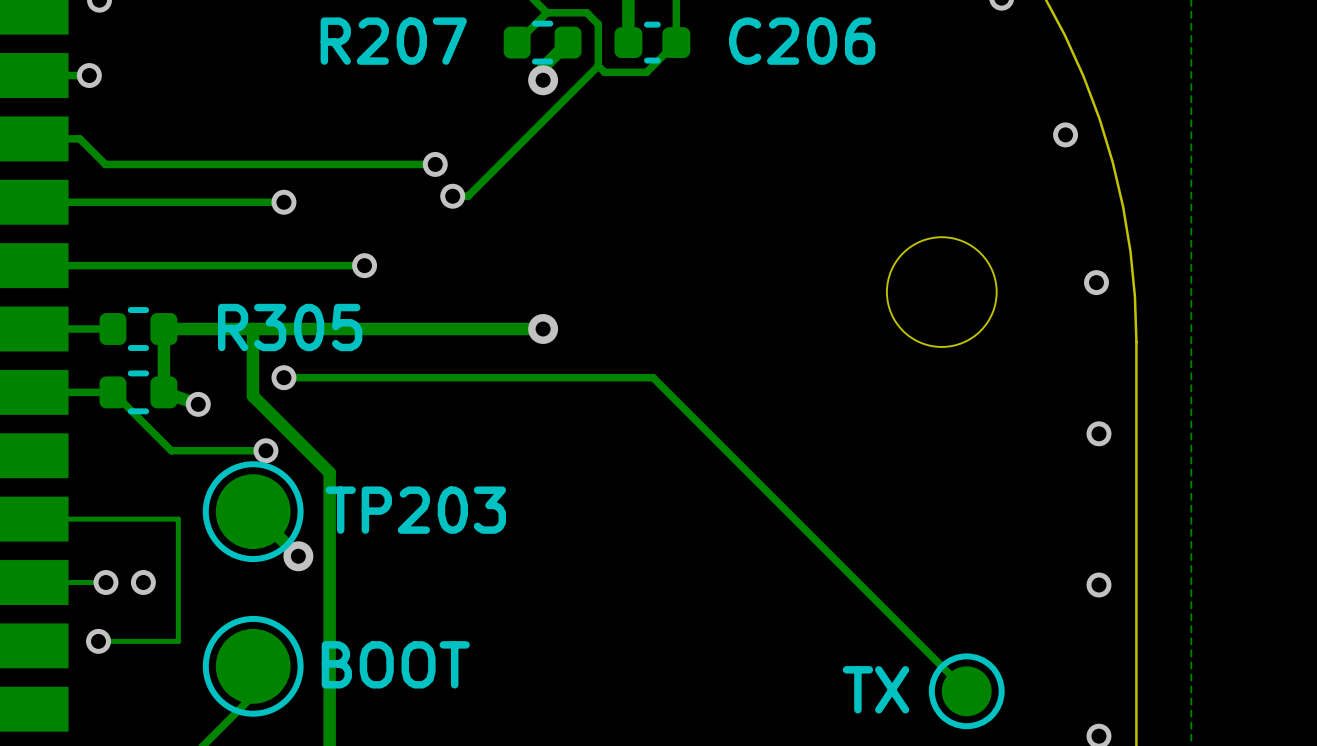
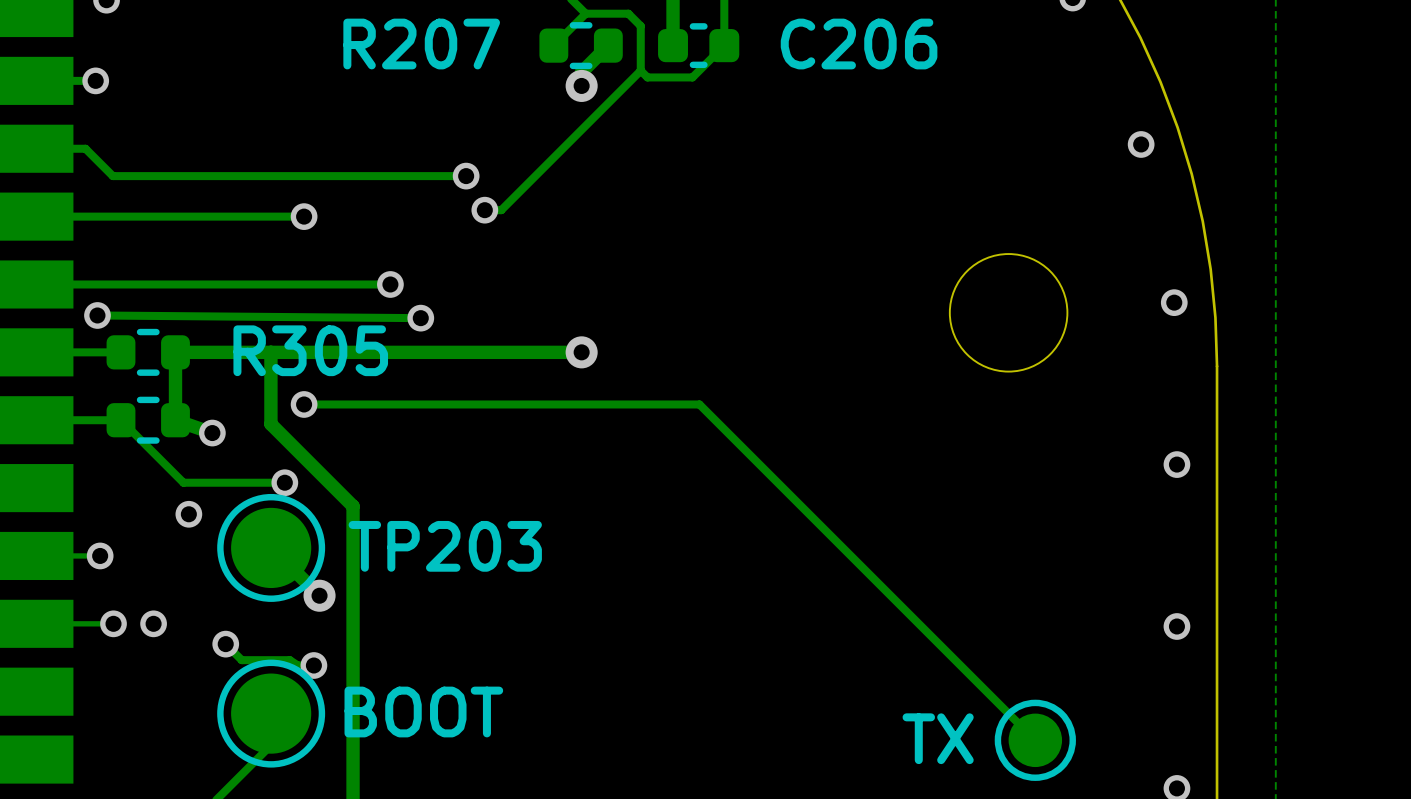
track: none -> (97, 315) (420, 318)
via: none -> (97, 315)
via: none -> (420, 318)
via: none -> (188, 514)
track: (93, 519) (178, 519) (178, 641) (98, 641) -> none
via: none -> (100, 555)
track: none -> (225, 644) (241, 660) (289, 660) (297, 665) (313, 665)
via: none -> (225, 644)
via: none -> (313, 665)
via: (98, 641) -> none

